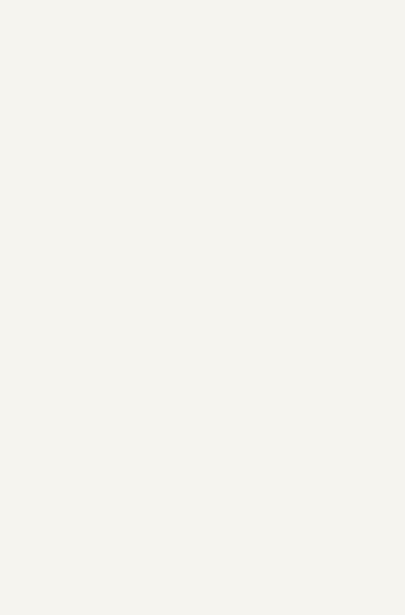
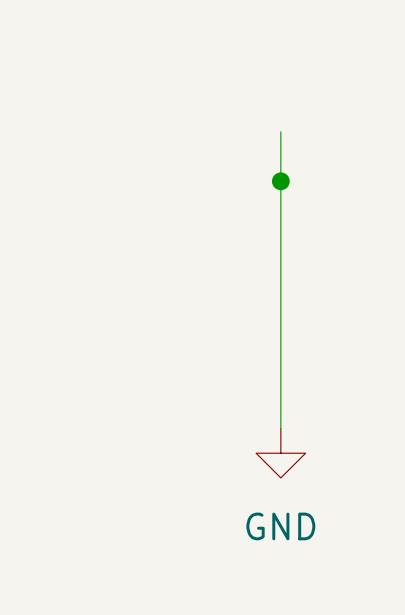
wire: none -> (280, 131) (280, 428)
junction: none -> (280, 181)
power symbol: none -> GND (280, 453)

